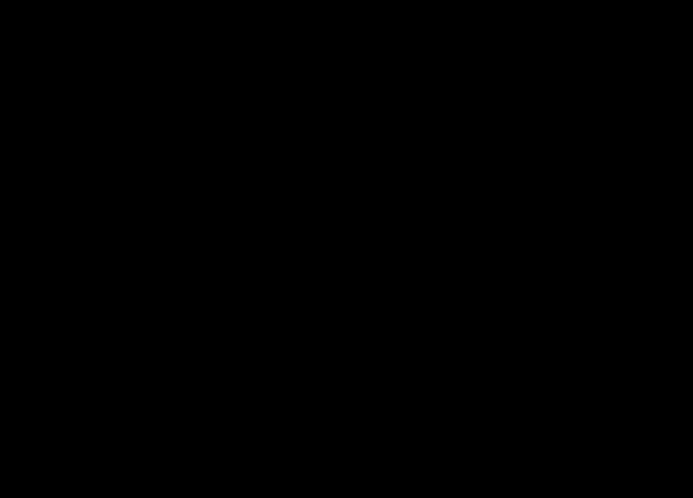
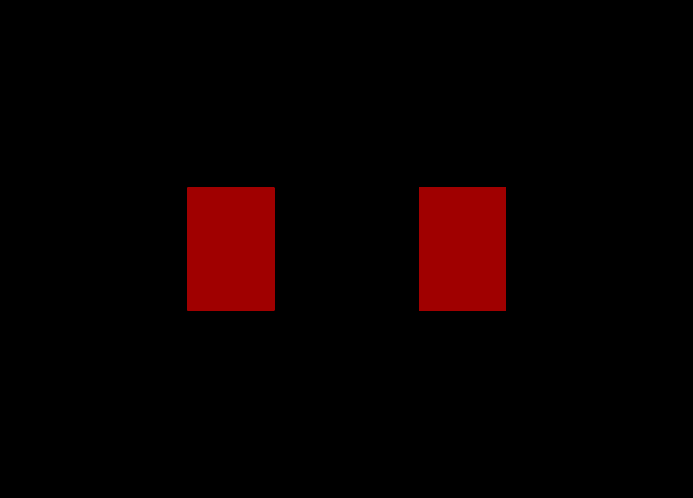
part: none -> (346, 249)

